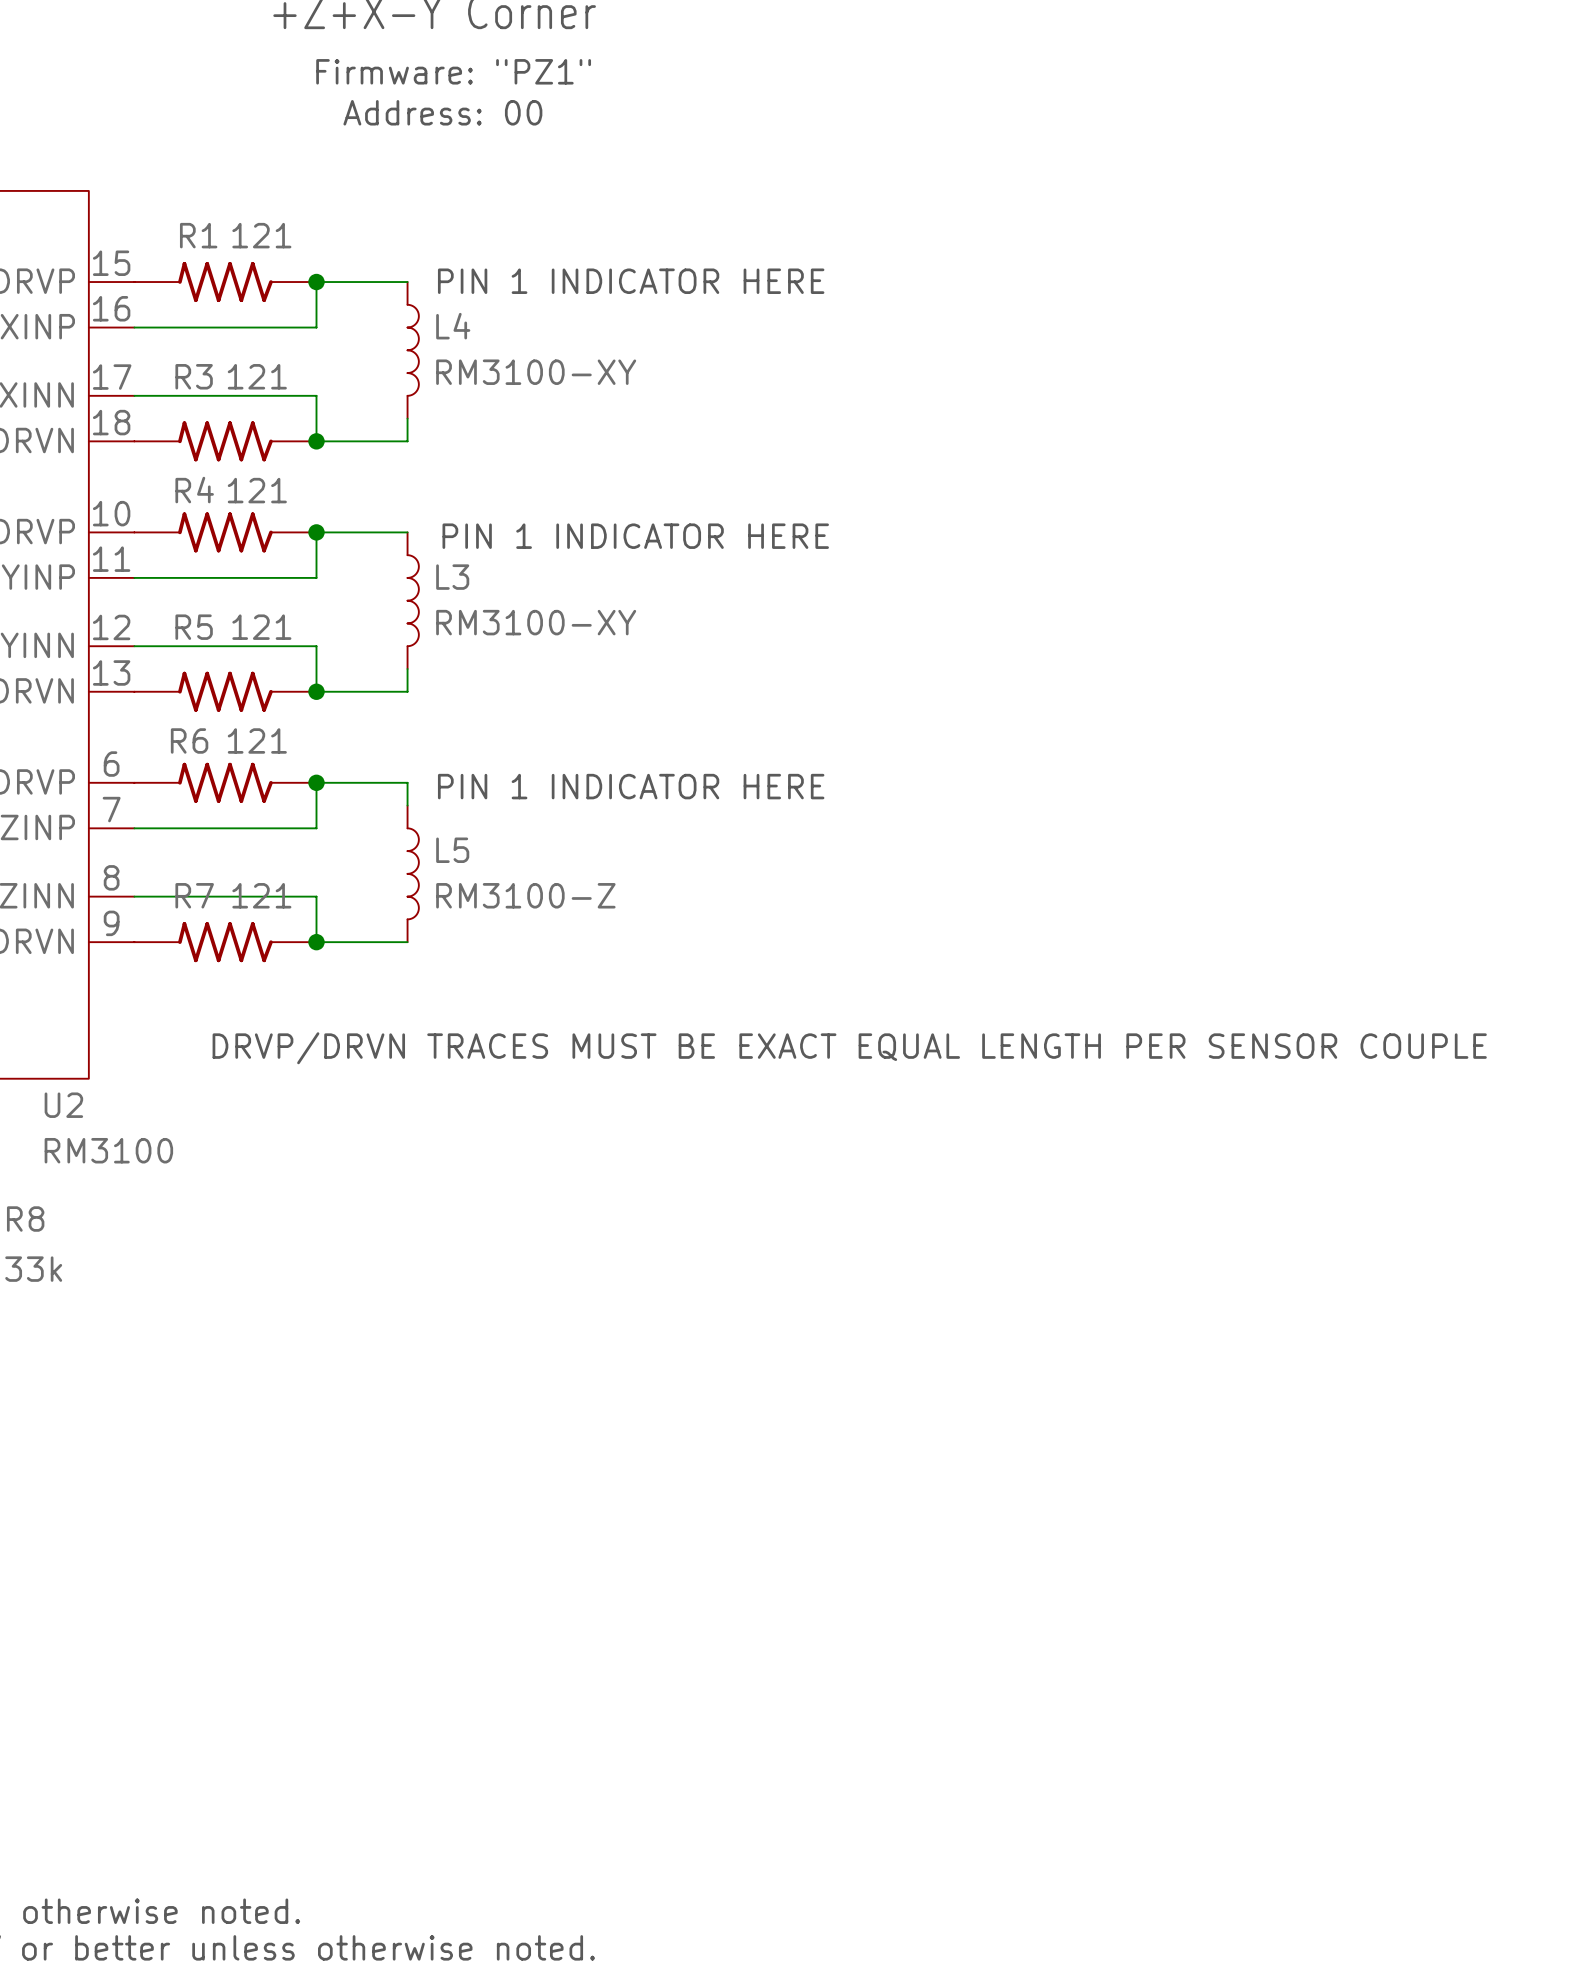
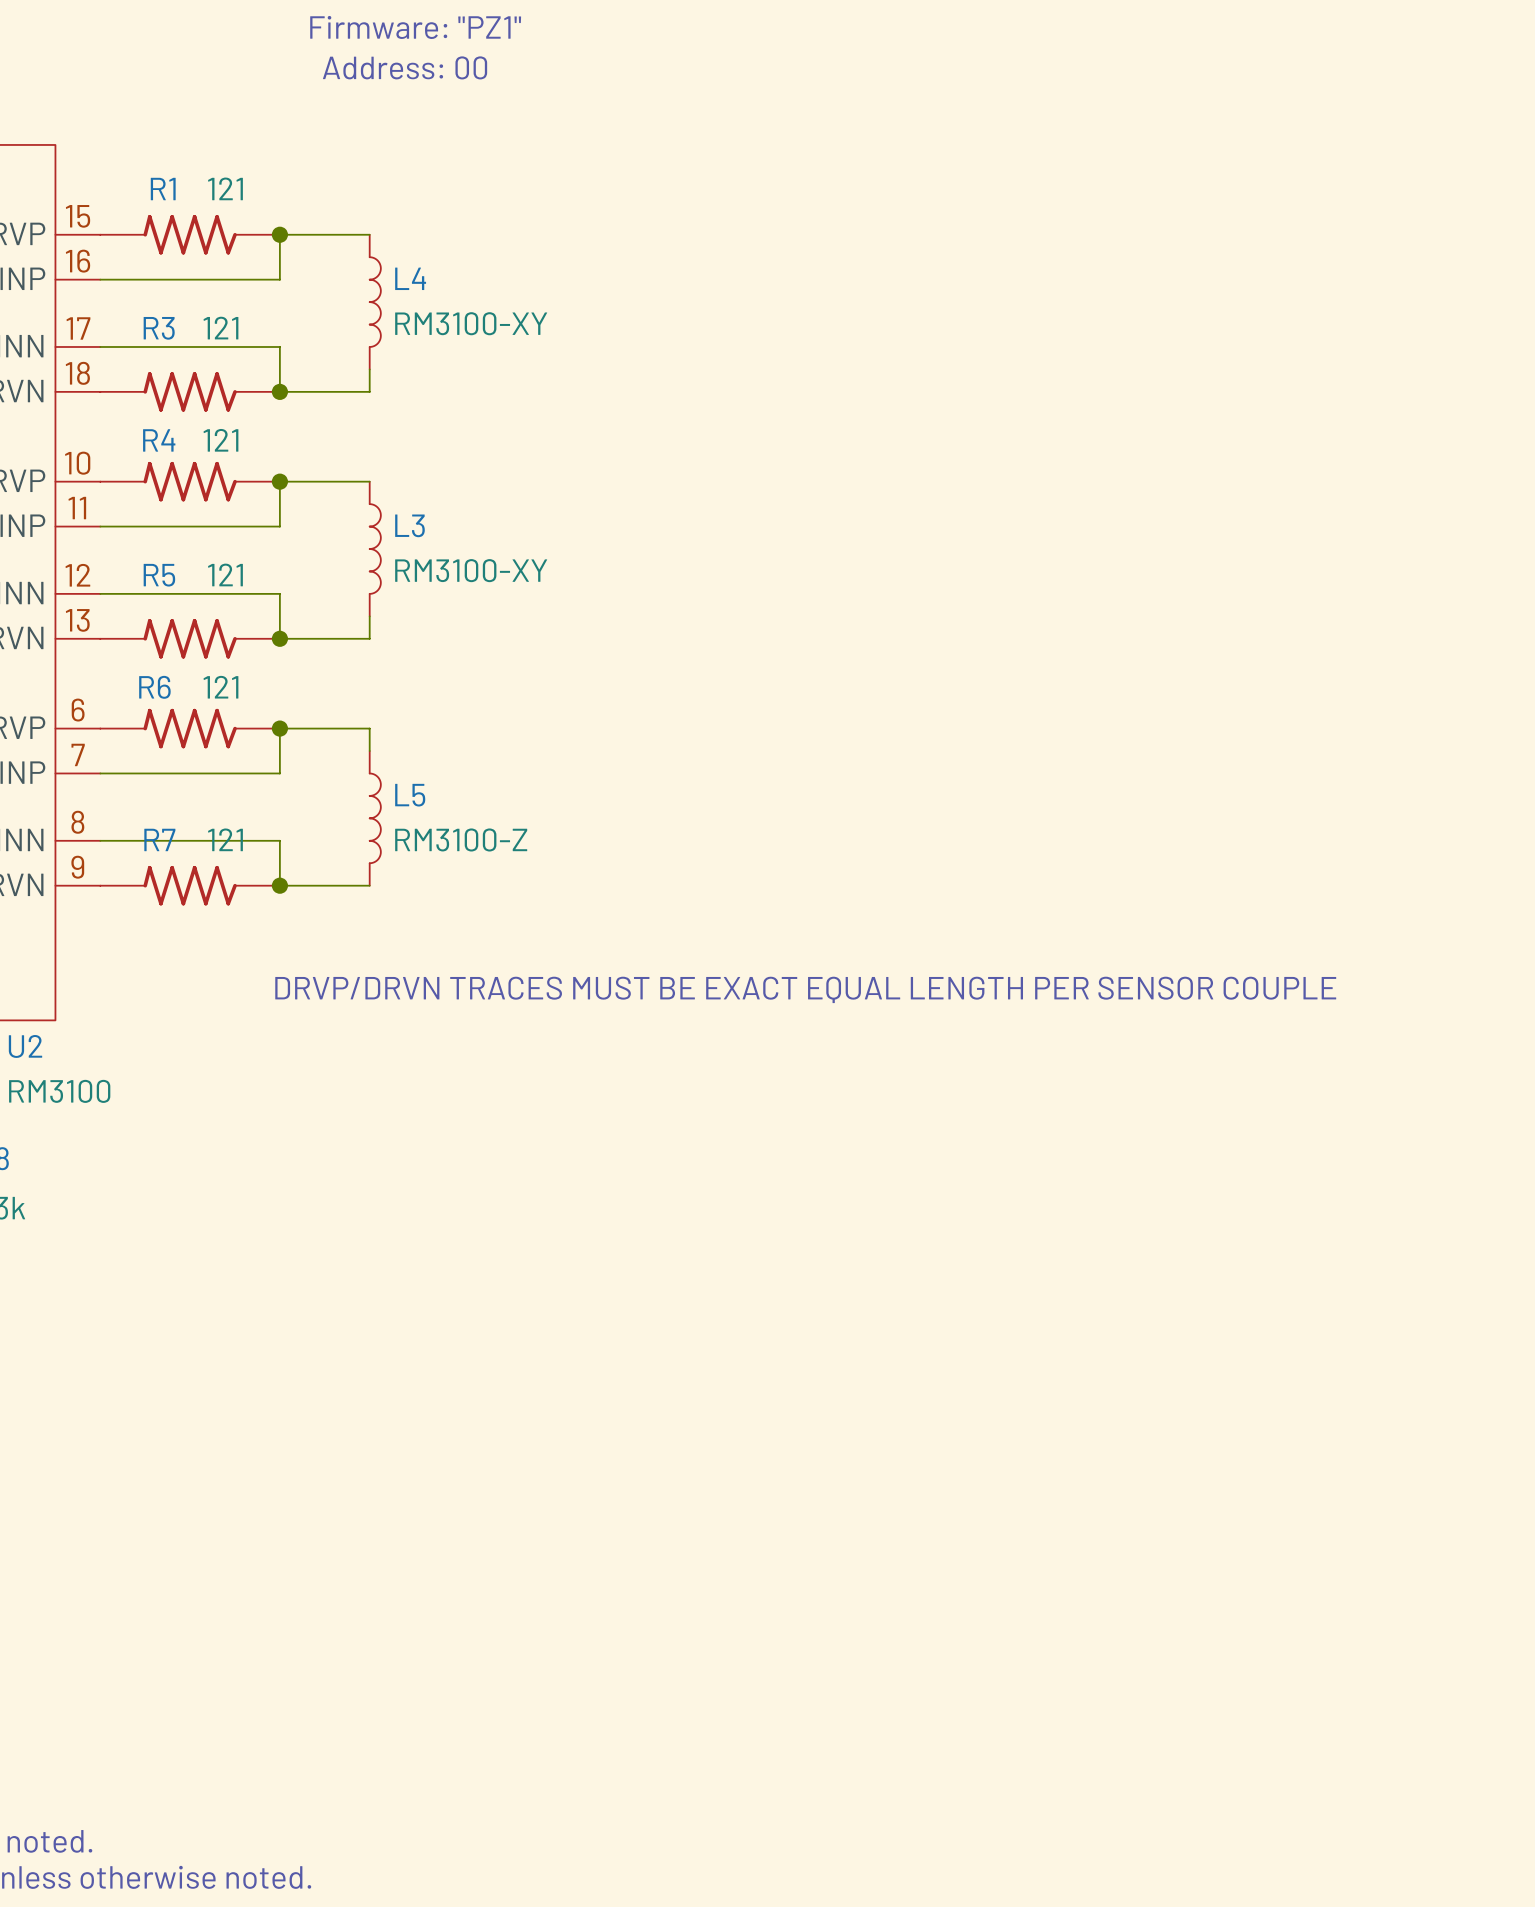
text: PIN 1 INDICATOR HERE (631, 281) -> none
text: PIN 1 INDICATOR HERE (635, 536) -> none
text: PIN 1 INDICATOR HERE (631, 786) -> none

